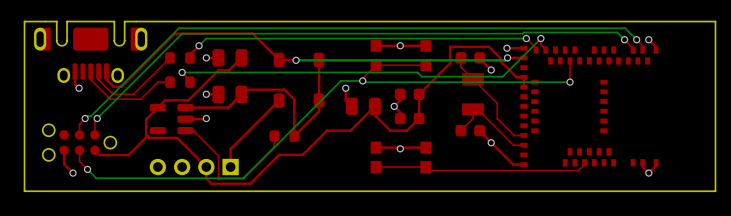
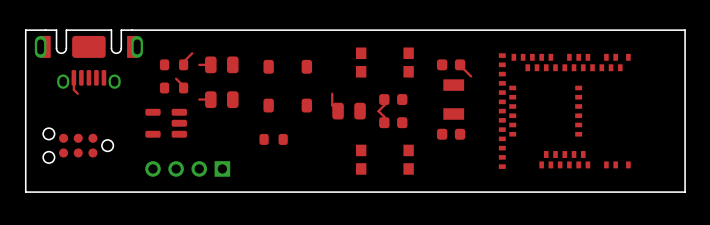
top track: (526, 38) (536, 50) -> none
bottom track: (526, 38) (206, 38) (199, 45) -> none
via: (526, 38) -> none
top track: (540, 38) (540, 45) (545, 50) -> none
bottom track: (540, 38) (502, 76) (421, 76) (417, 72) (182, 72) -> none
via: (540, 38) -> none
top track: (624, 39) (633, 50) -> none
bottom track: (624, 39) (617, 32) (182, 33) (97, 118) -> none
via: (624, 39) -> none
top track: (636, 39) (642, 45) (642, 50) -> none
bottom track: (636, 39) (625, 28) (178, 28) (91, 116) (85, 118) (87, 118) -> none
via: (636, 39) -> none
top track: (648, 39) (656, 46) (656, 50) -> none
via: (648, 39) -> none
via: (199, 45) -> none
via: (400, 45) -> none
top track: (425, 45) (376, 45) -> none
via: (506, 48) -> none
top track: (523, 48) (506, 48) -> none
top track: (169, 57) (133, 94) (113, 94) (98, 79) (98, 71) -> none
via: (206, 57) -> none
top track: (241, 57) (229, 70) (218, 70) (188, 100) (165, 100) (146, 119) (147, 136) -> none
top track: (460, 57) (460, 66) (497, 103) (497, 118) (514, 135) (523, 135) -> none
bottom track: (507, 57) (505, 60) (296, 60) -> none
via: (507, 57) -> none
top track: (523, 57) (507, 57) -> none
top track: (319, 59) (319, 111) (294, 136) (294, 99) (284, 89) (246, 89) (228, 107) (185, 107) -> none
top track: (296, 60) (279, 59) (252, 33) (174, 33) (121, 86) (113, 86) (106, 79) (106, 71) -> none
via: (296, 60) -> none
top track: (570, 60) (570, 82) -> none
top track: (425, 65) (376, 65) (362, 78) (362, 80) -> none
via: (491, 70) -> none
top track: (90, 71) (90, 79) (110, 99) (140, 99) (157, 82) (169, 82) -> none
via: (182, 72) -> none
via: (362, 80) -> none
bottom track: (570, 82) (340, 80) (243, 178) (96, 178) (87, 169) -> none
via: (570, 82) -> none
top track: (523, 87) (523, 77) (516, 77) (488, 46) (450, 46) (450, 63) (419, 94) (419, 118) (406, 130) (390, 130) (374, 115) (374, 106) (350, 130) (326, 130) (302, 154) (279, 154) (250, 183) (211, 183) (206, 178) (206, 167) (177, 137) (149, 137) (147, 136) -> none
via: (79, 88) -> none
via: (345, 88) -> none
via: (206, 94) -> none
top track: (279, 100) (230, 149) (230, 167) -> none
via: (394, 106) -> none
top track: (85, 118) (79, 124) (79, 134) -> none
via: (85, 118) -> none
top track: (97, 118) (94, 120) (94, 134) -> none
via: (97, 118) -> none
top track: (206, 118) (185, 119) -> none
via: (206, 118) -> none
top track: (185, 130) (193, 130) (218, 155) (218, 178) (242, 178) (274, 146) (274, 136) -> none
top track: (460, 130) (473, 118) (473, 109) (477, 109) (513, 145) (523, 145) -> none
top track: (479, 130) (513, 164) (523, 164) -> none
top track: (147, 136) (128, 155) (99, 155) (94, 150) -> none
via: (491, 142) -> none
top track: (425, 147) (376, 147) -> none
via: (400, 148) -> none
top track: (64, 150) (64, 164) (73, 173) -> none
top track: (79, 150) (79, 161) (87, 169) -> none
top track: (584, 162) (578, 170) (429, 170) (425, 167) (376, 167) -> none
top track: (656, 162) (656, 165) (648, 173) (642, 167) (642, 162) -> none
via: (87, 169) -> none
via: (73, 173) -> none
via: (648, 173) -> none

